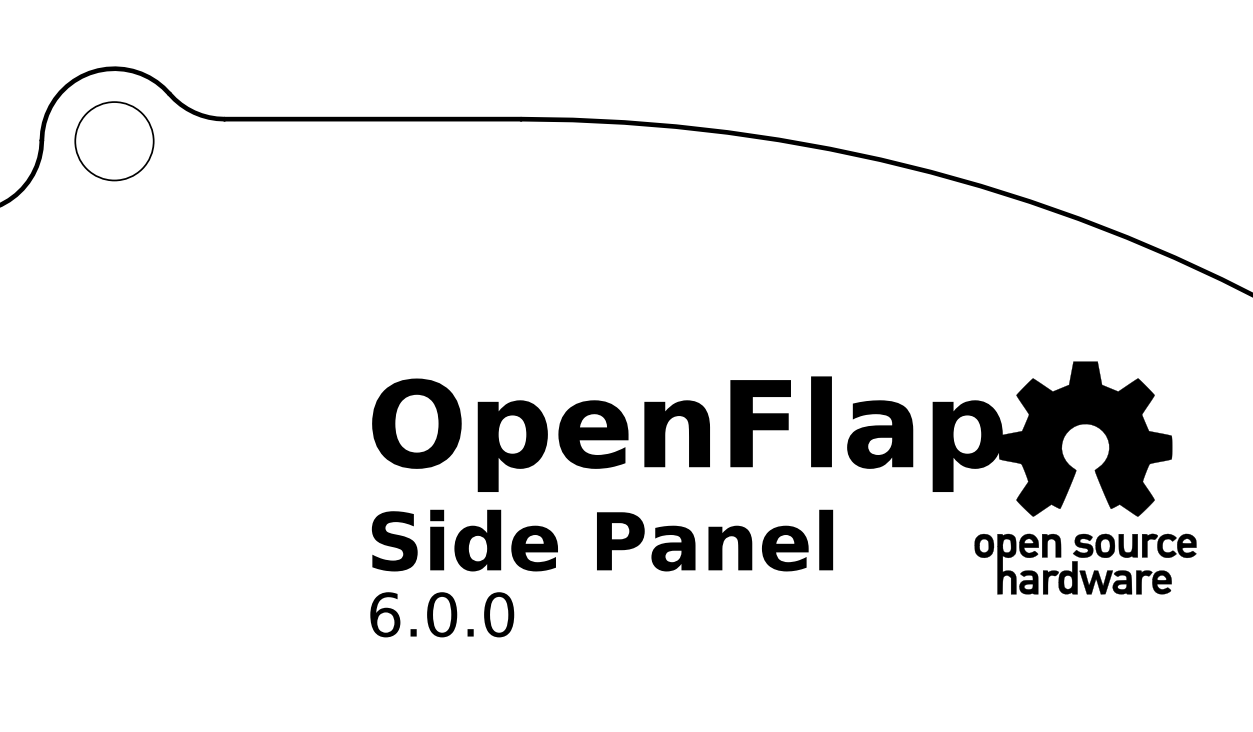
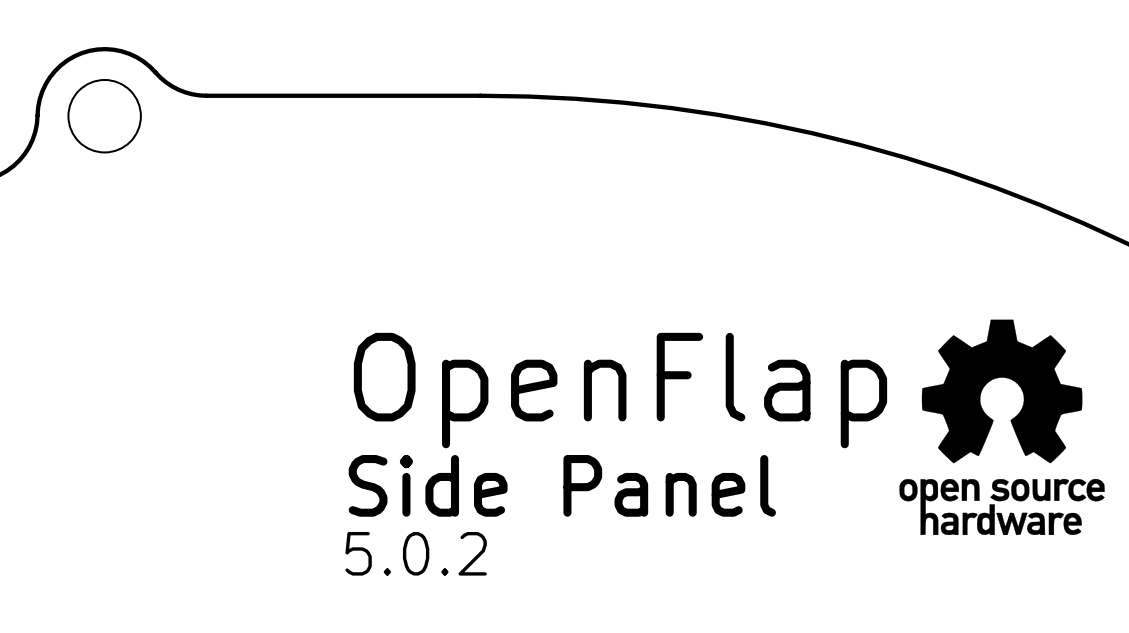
text: 6.0.0 (442, 614) -> 5.0.2 (416, 553)

